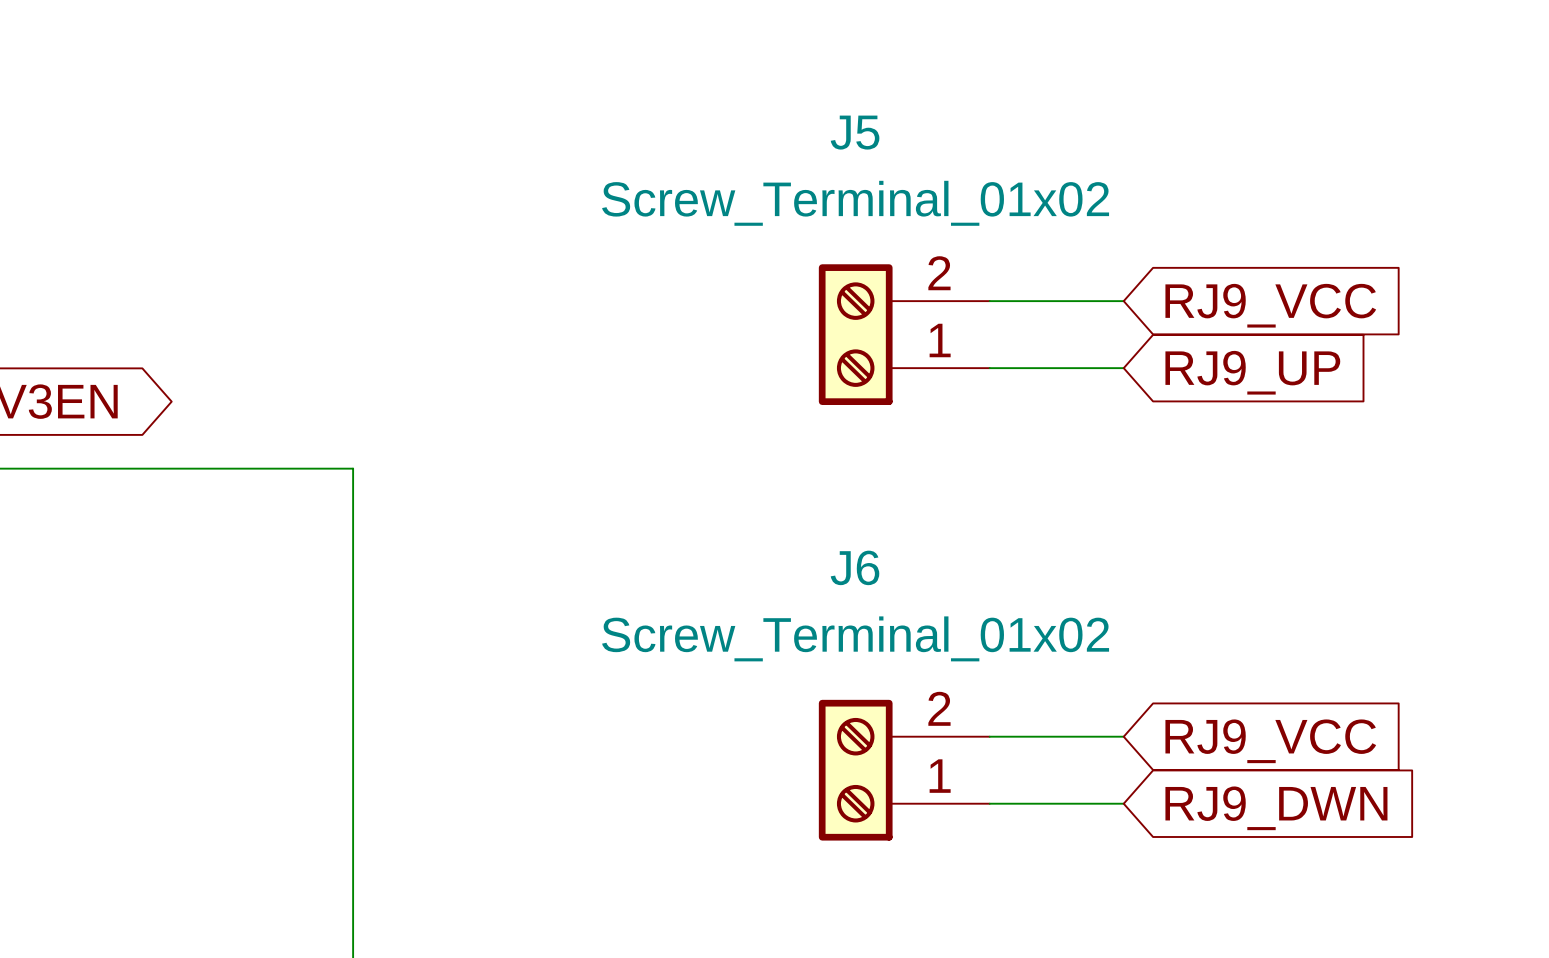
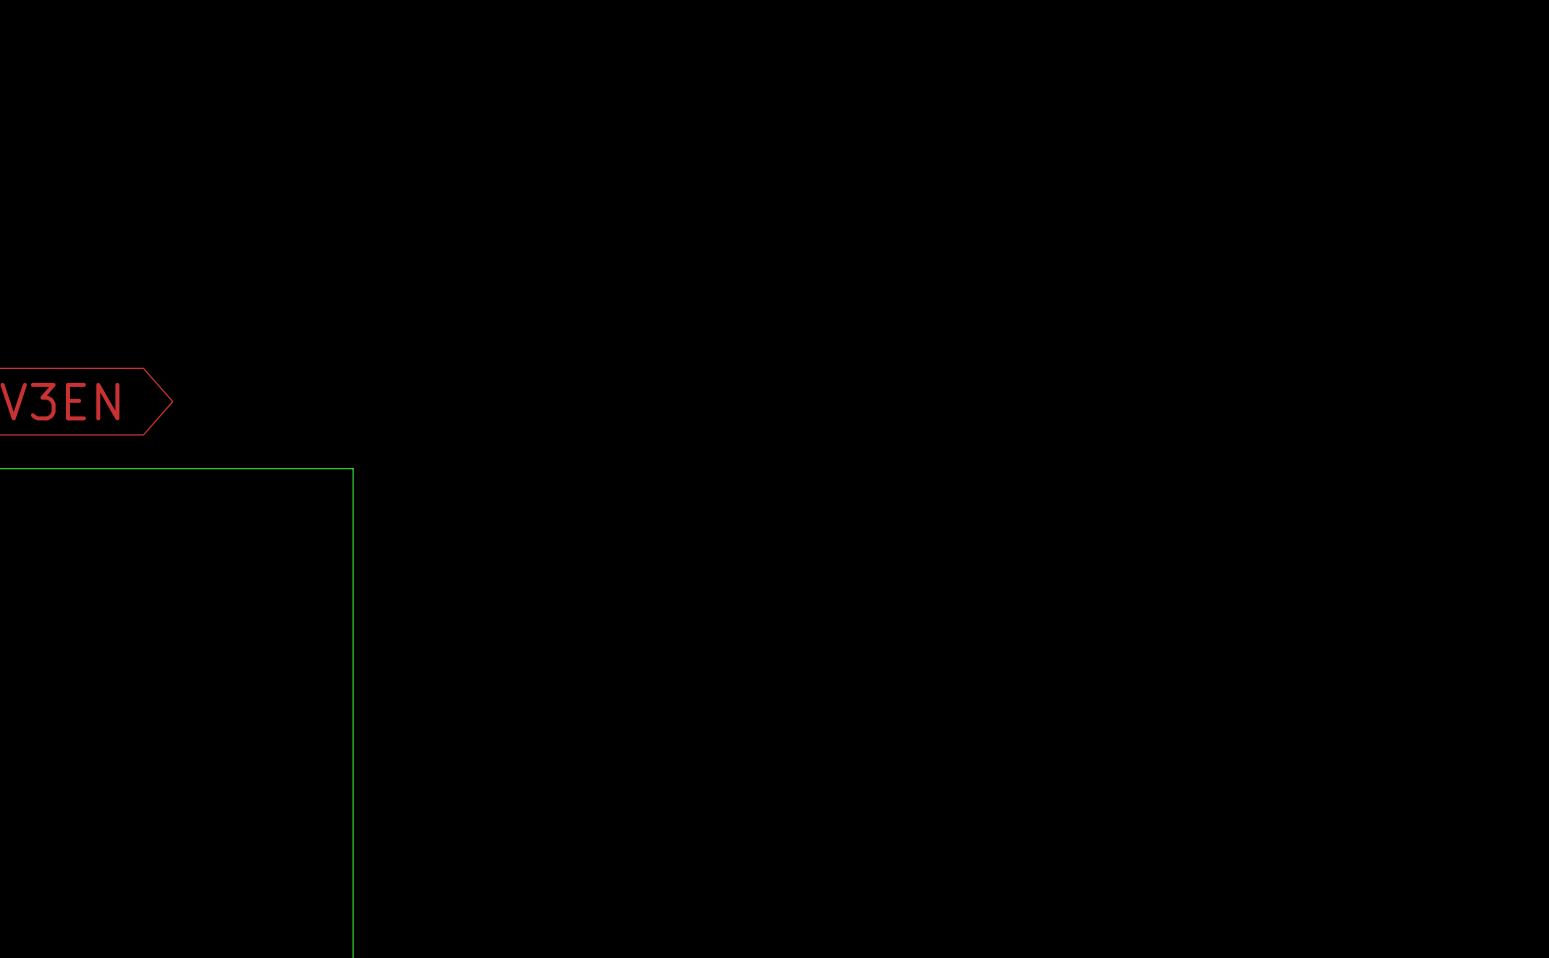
wire: (989, 301) (1123, 301) -> none
global label: RJ9_VCC (1270, 305) -> none
J5: Screw_Terminal_01x02 (904, 334) -> none
wire: (989, 368) (1123, 368) -> none
global label: RJ9_UP (1252, 372) -> none
wire: (989, 736) (1123, 736) -> none
global label: RJ9_VCC (1270, 741) -> none
J6: Screw_Terminal_01x02 (904, 770) -> none
wire: (989, 803) (1123, 803) -> none
global label: RJ9_DWN (1276, 808) -> none

